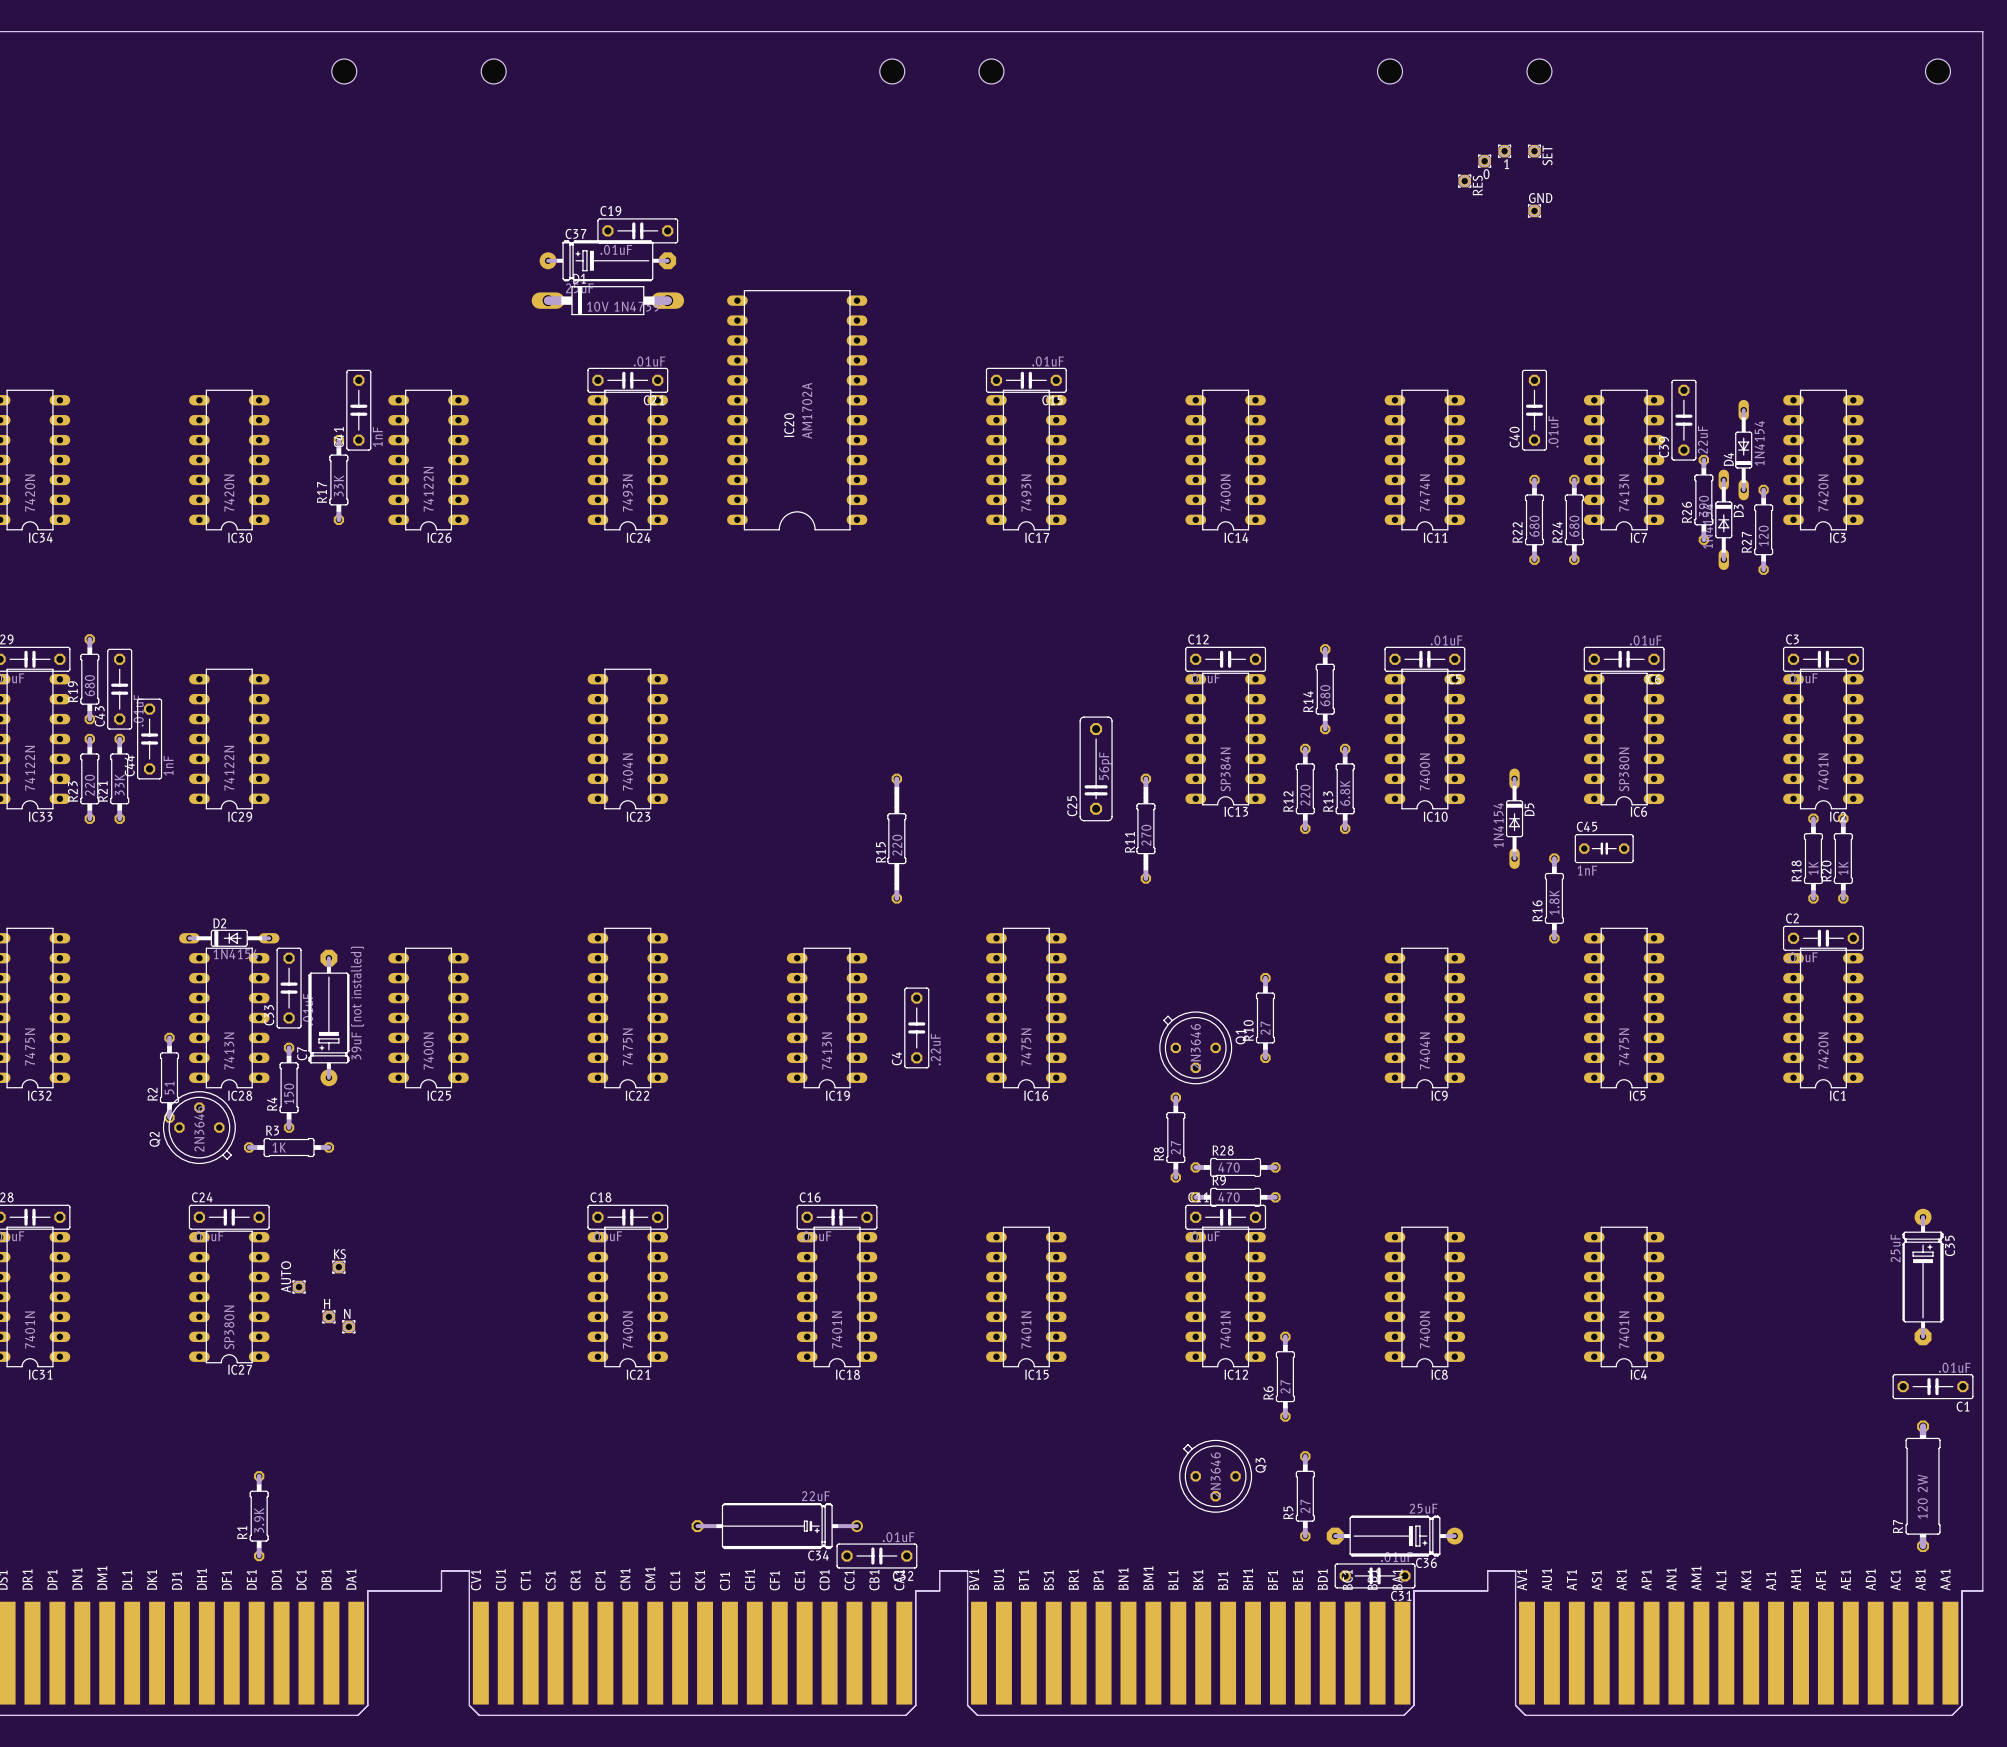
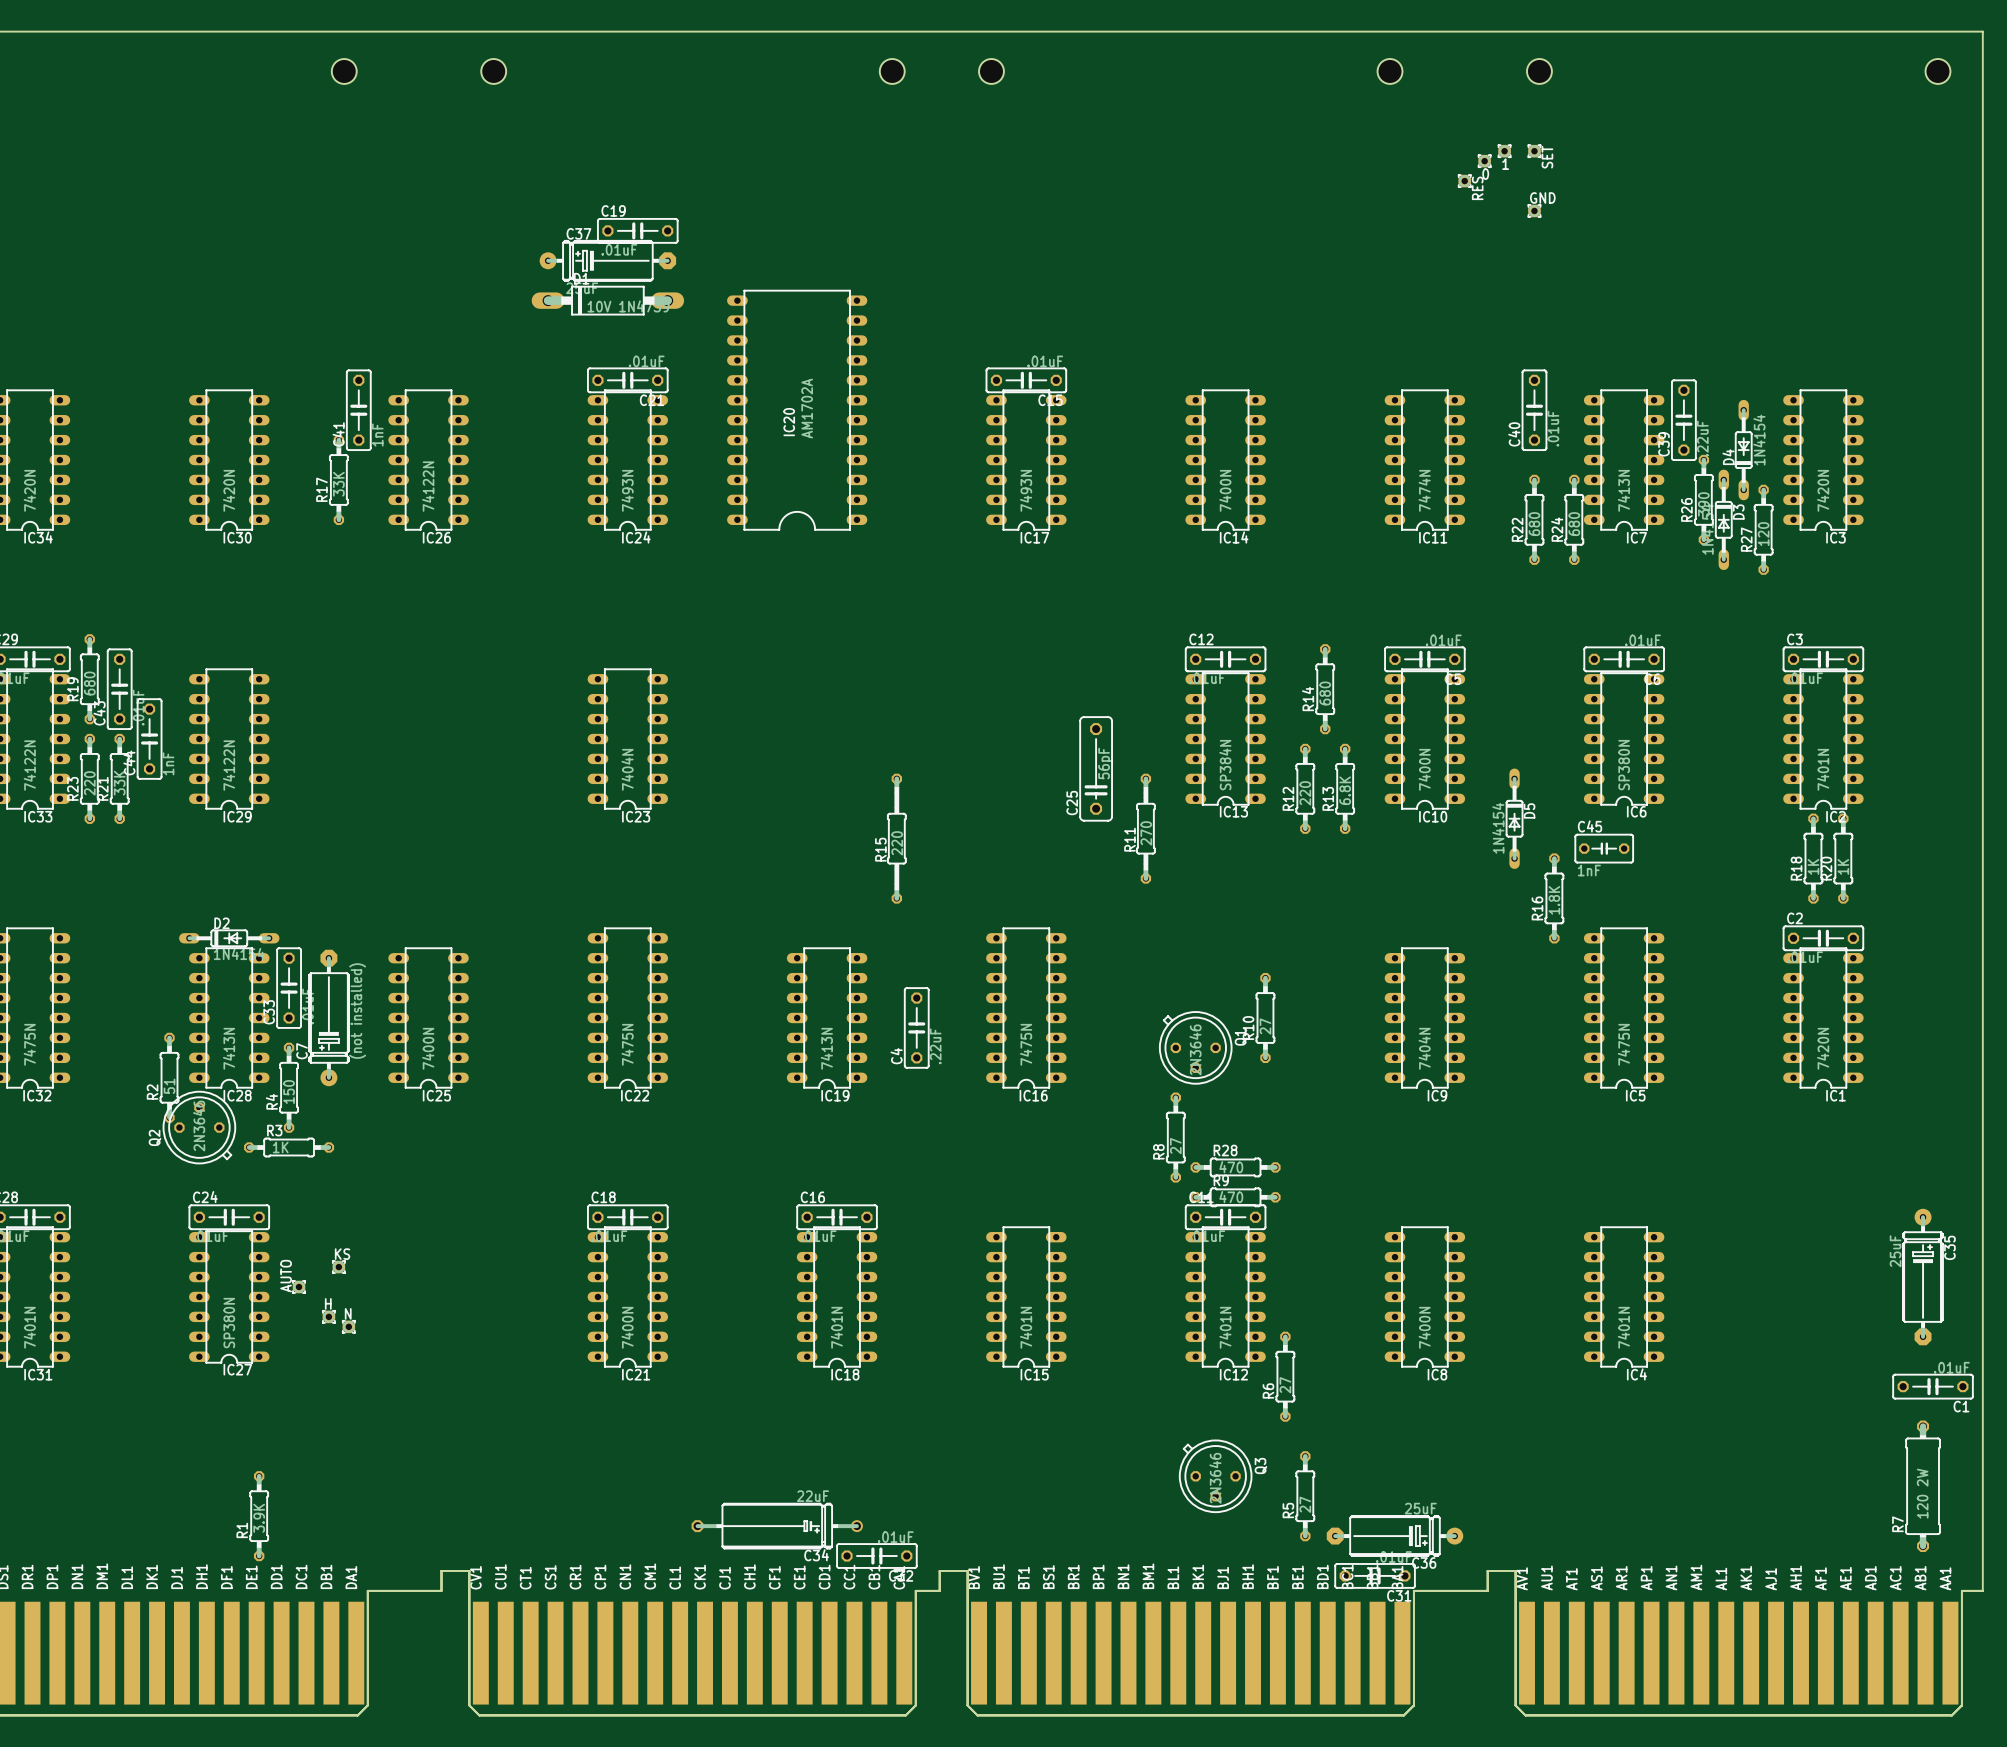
C7 value: 39uF (not installed) (357, 1003) -> (not installed) (357, 1011)

